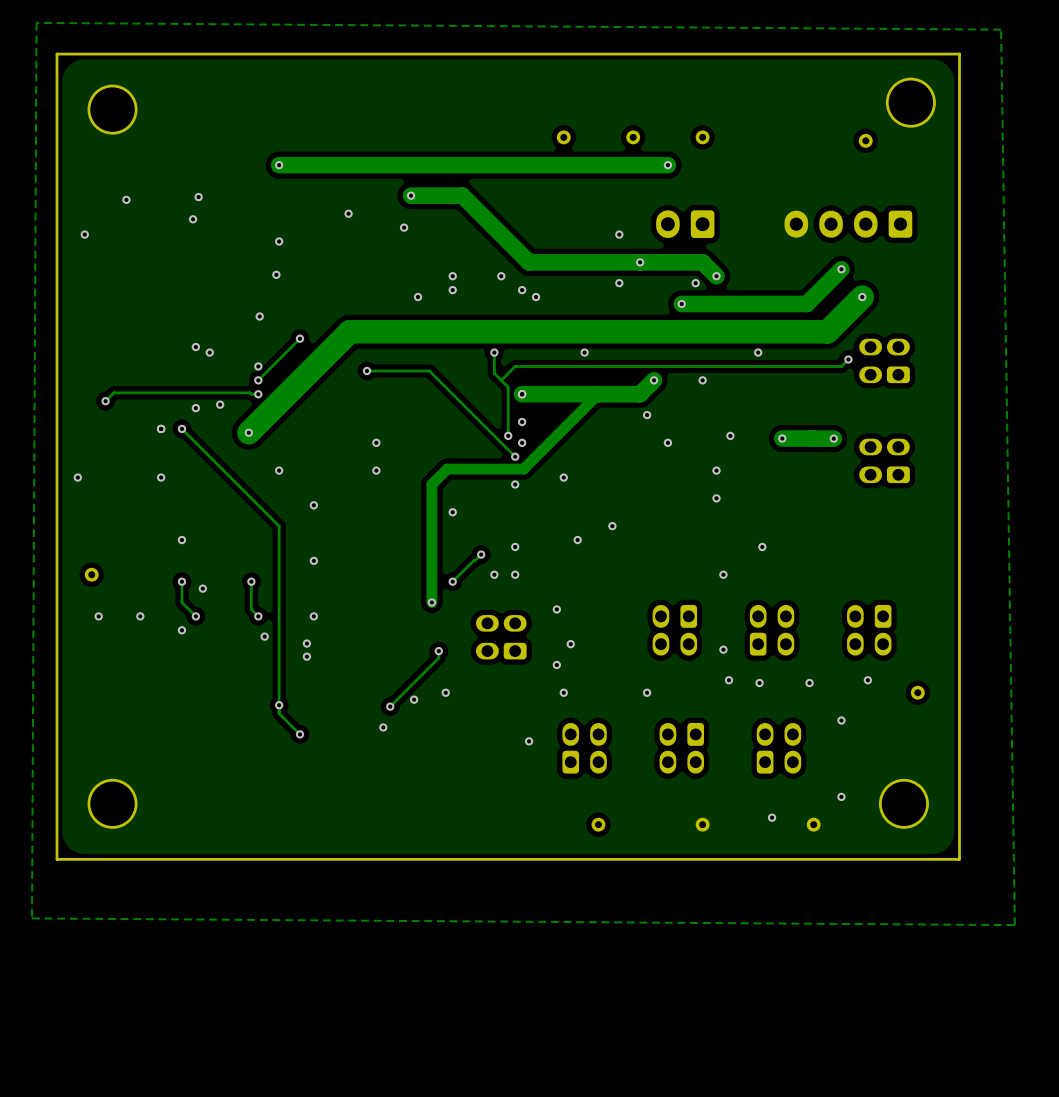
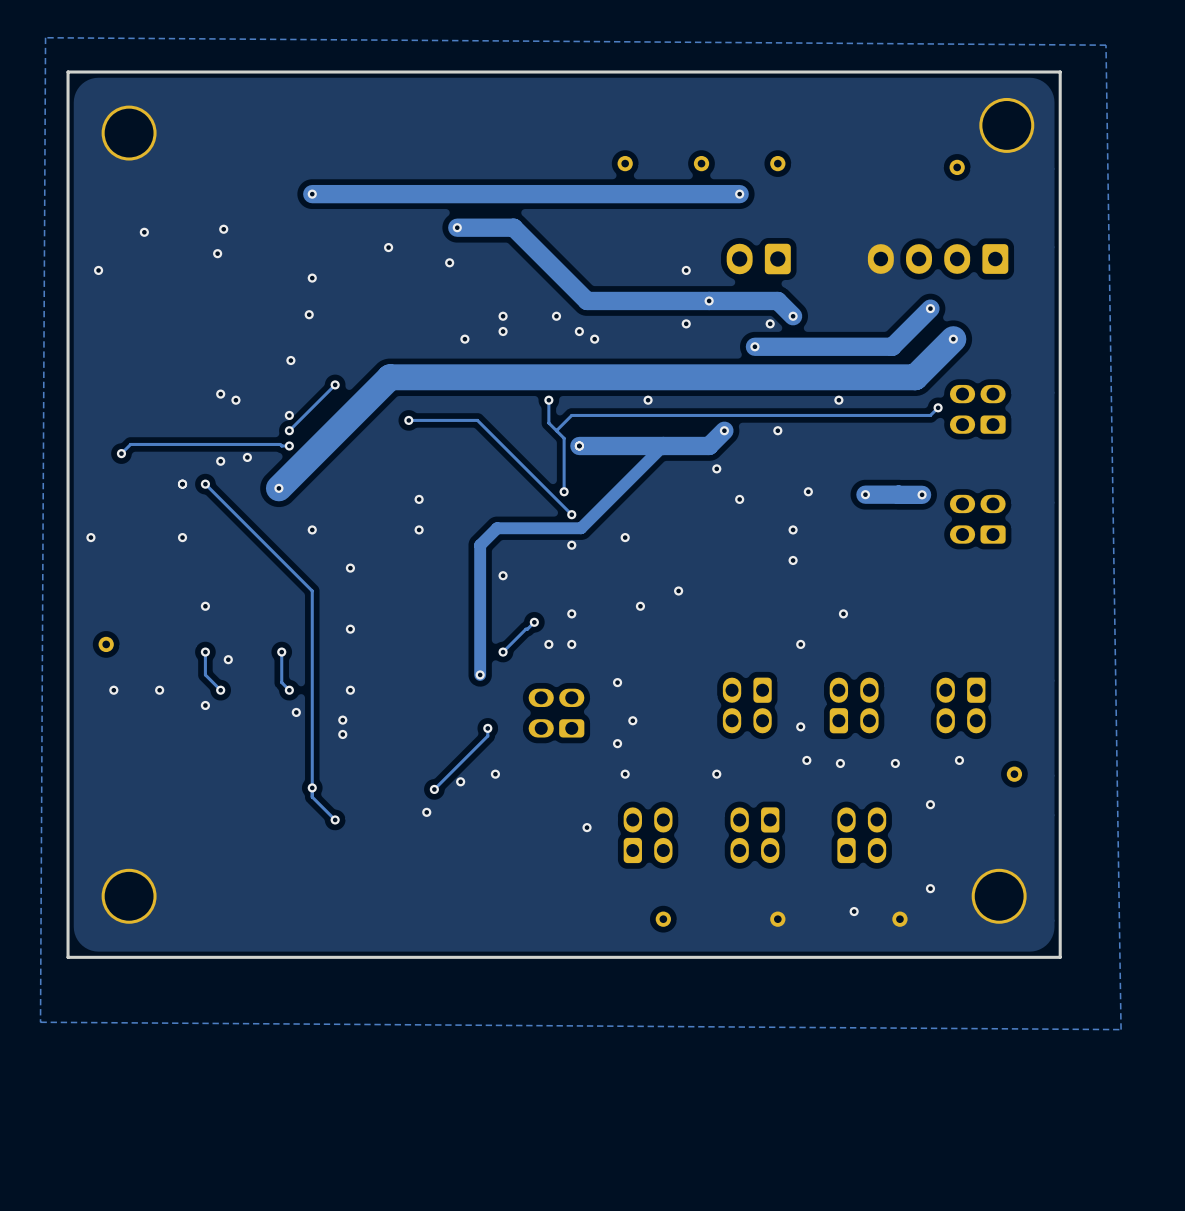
via: (522, 422) -> none
via: (522, 442) -> none

